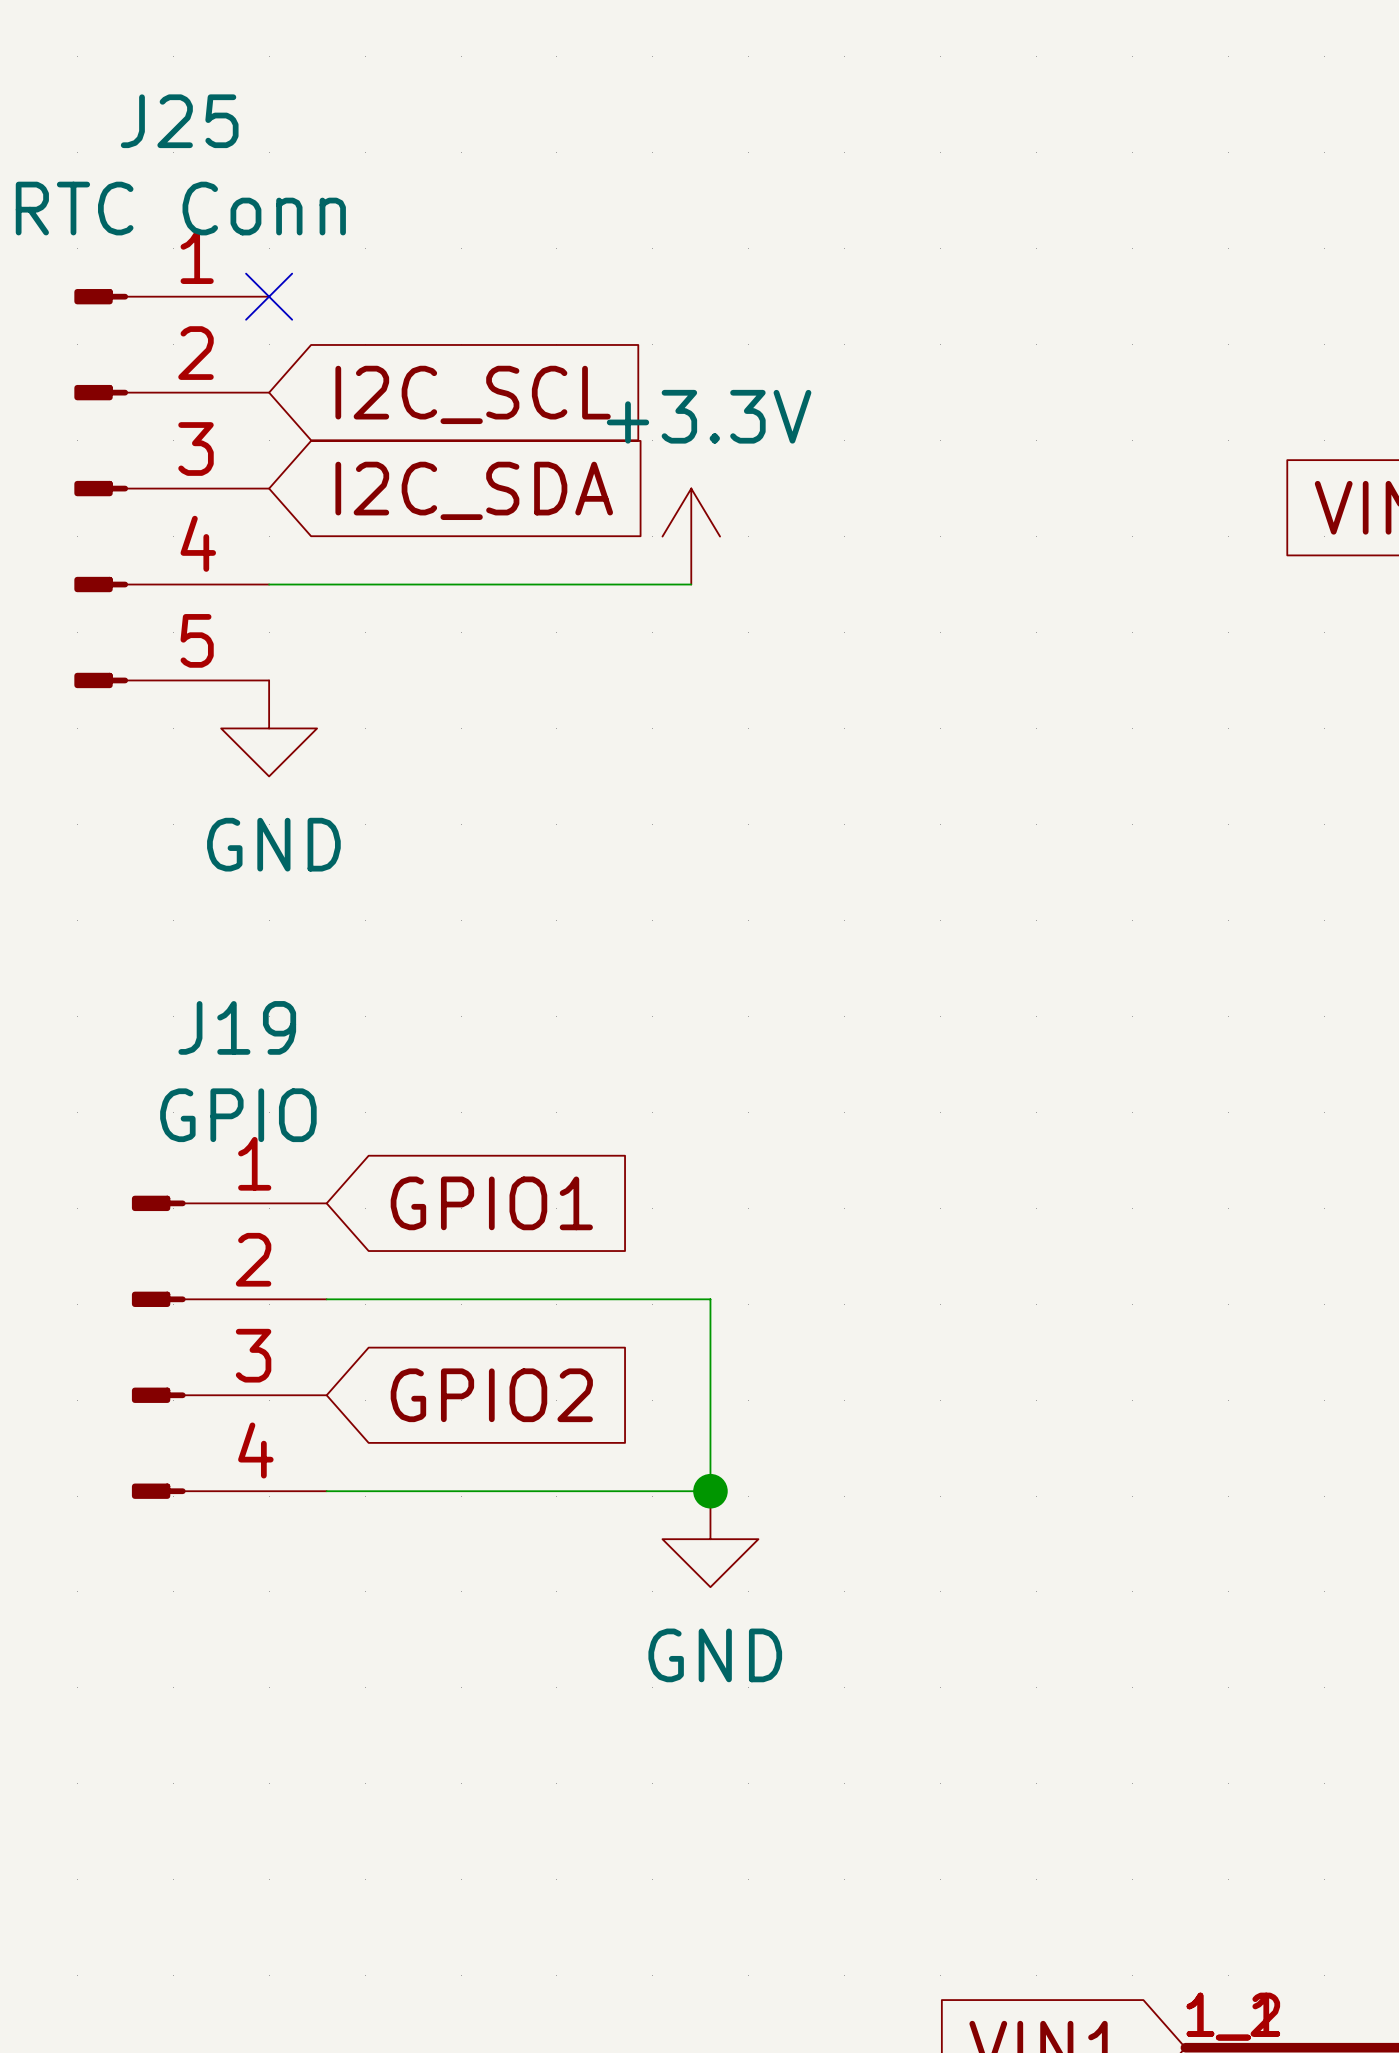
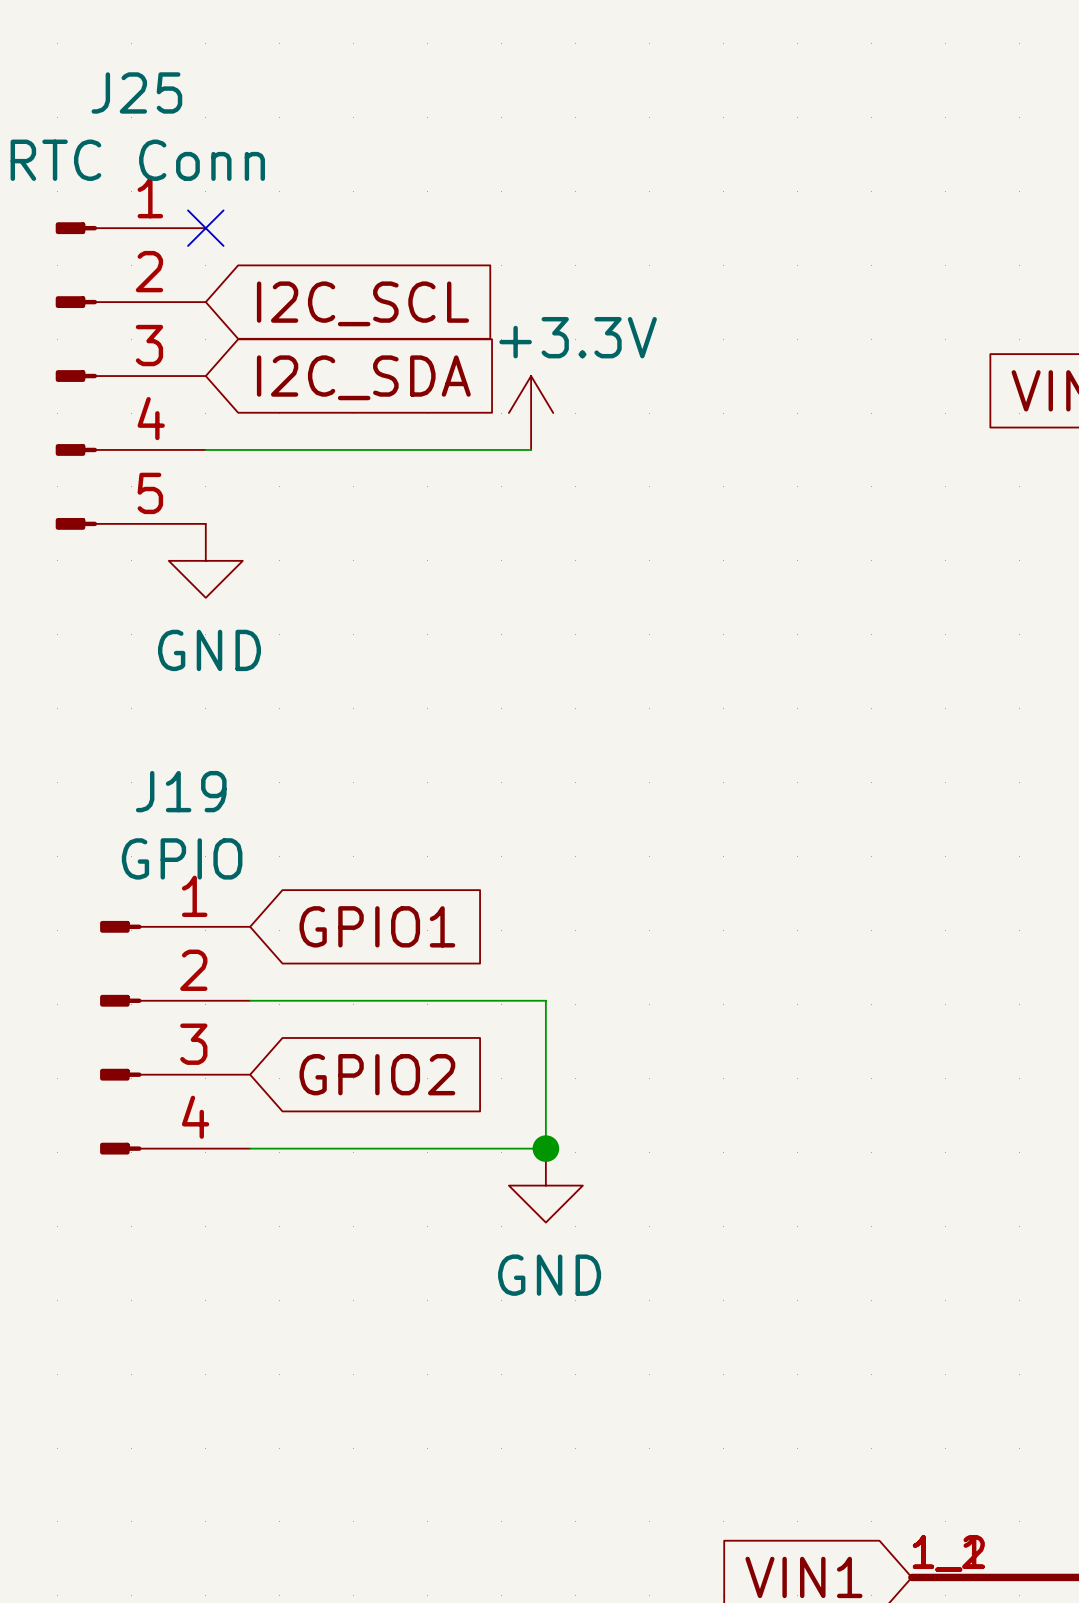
power symbol text position: +3.3V (709, 416) -> +3.3V (578, 337)

